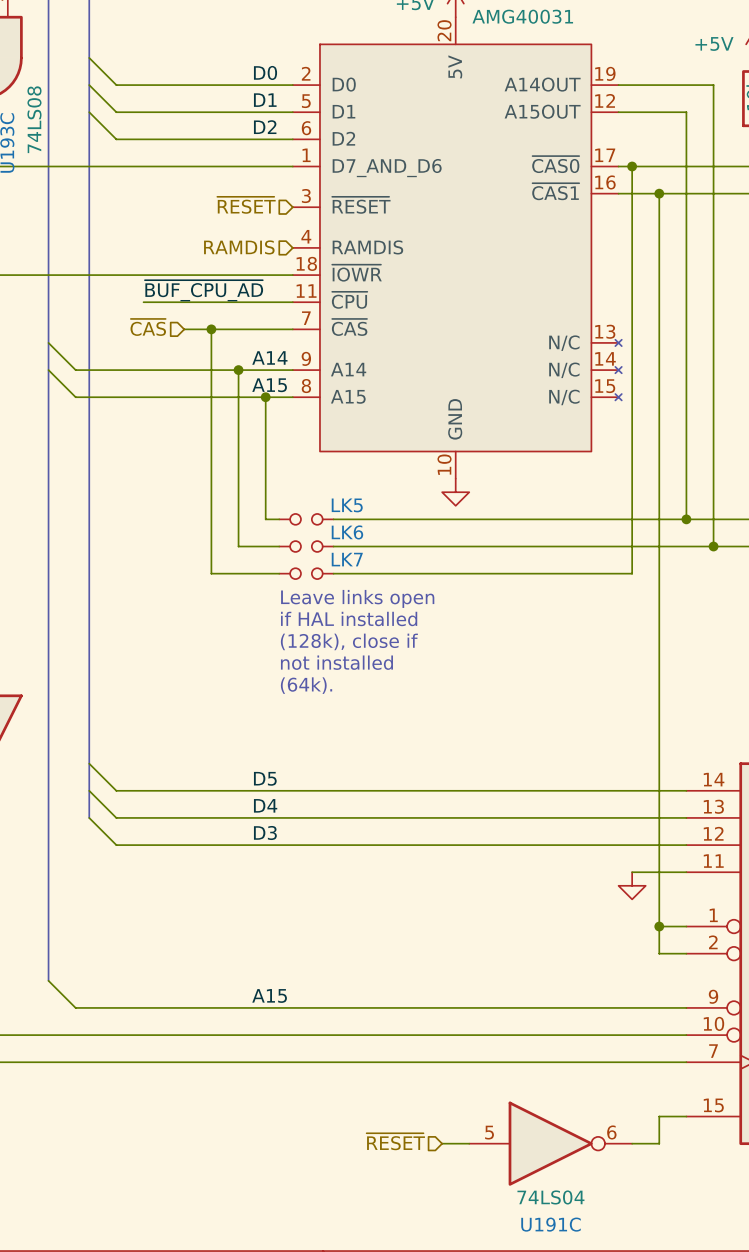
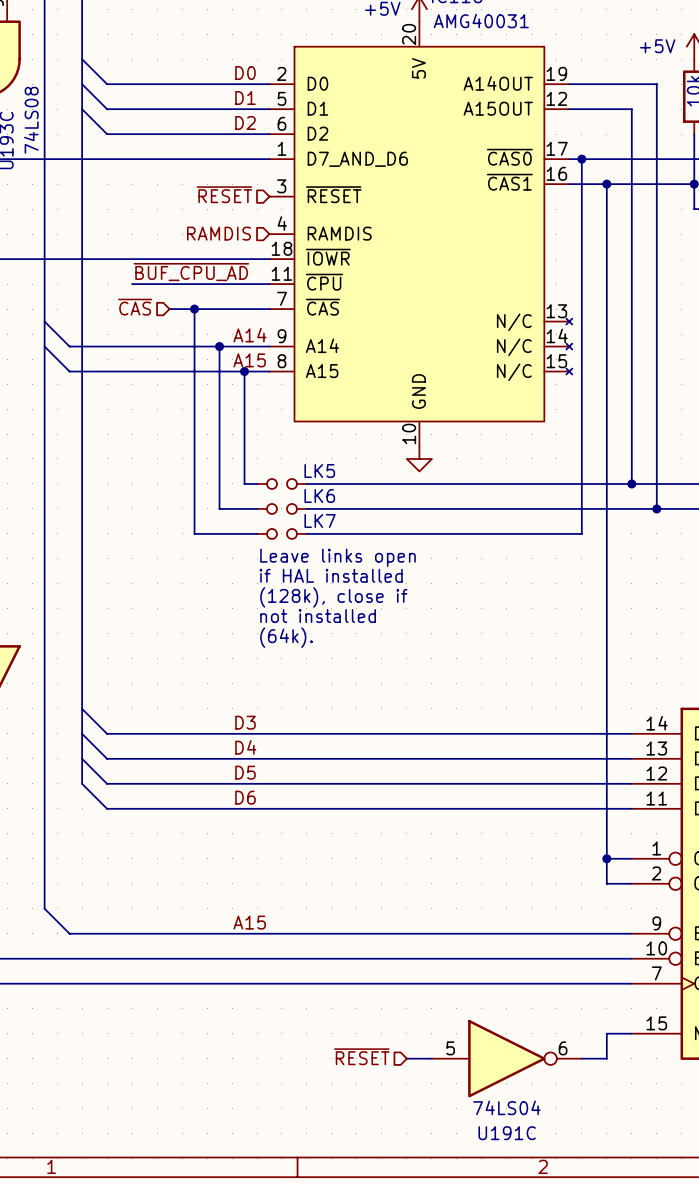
label: D5 (265, 778) -> D3 (245, 722)
bus: none -> (82, 758) (82, 783)
label: D3 (265, 832) -> D5 (245, 772)
wire: none -> (82, 783) (107, 808) (581, 808)
label: none -> D6 (245, 797)
power symbol: (632, 885) -> none

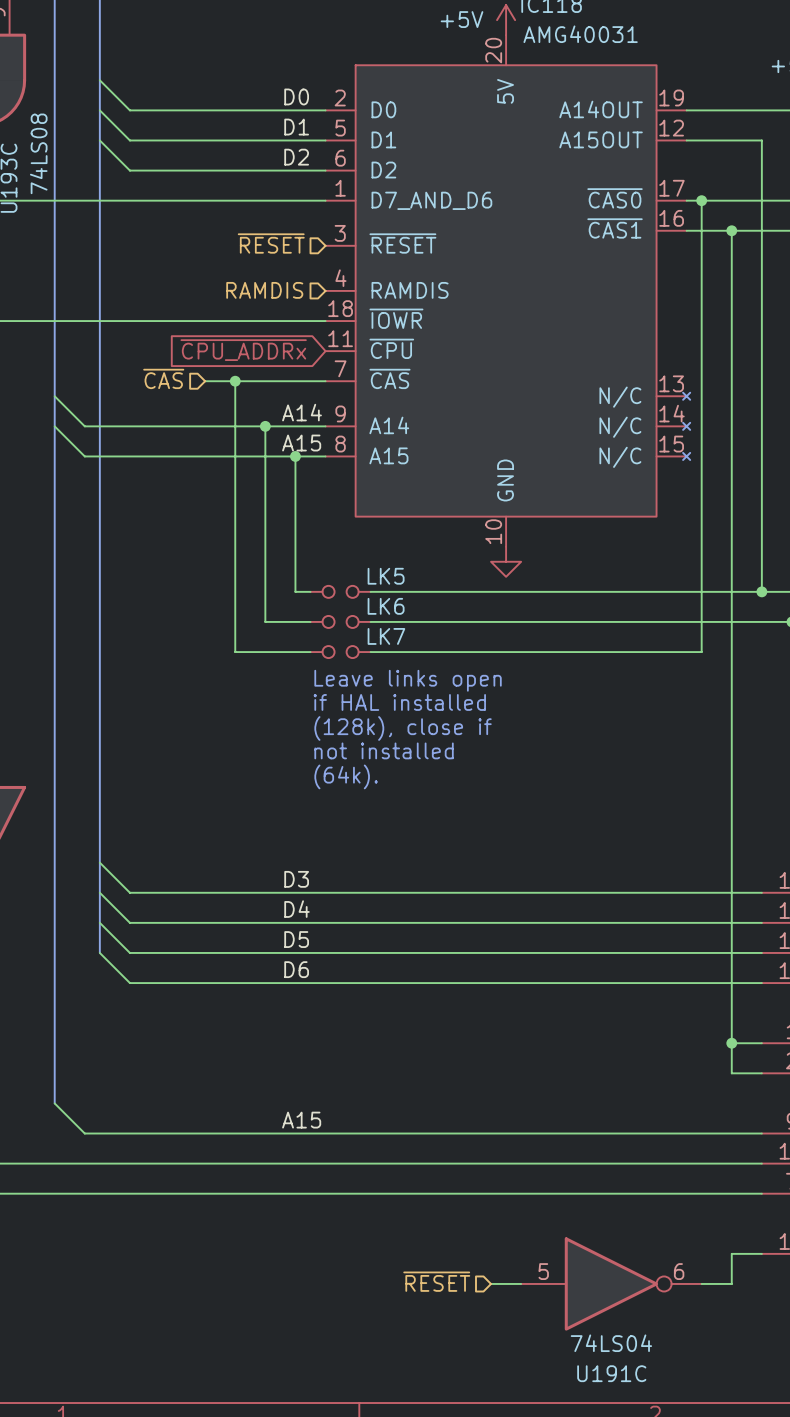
label: ~{BUF_CPU_AD} (191, 272) -> none
global label: none -> ~{CPU_ADDRx} (243, 350)
wire: (132, 284) (269, 284) -> none

